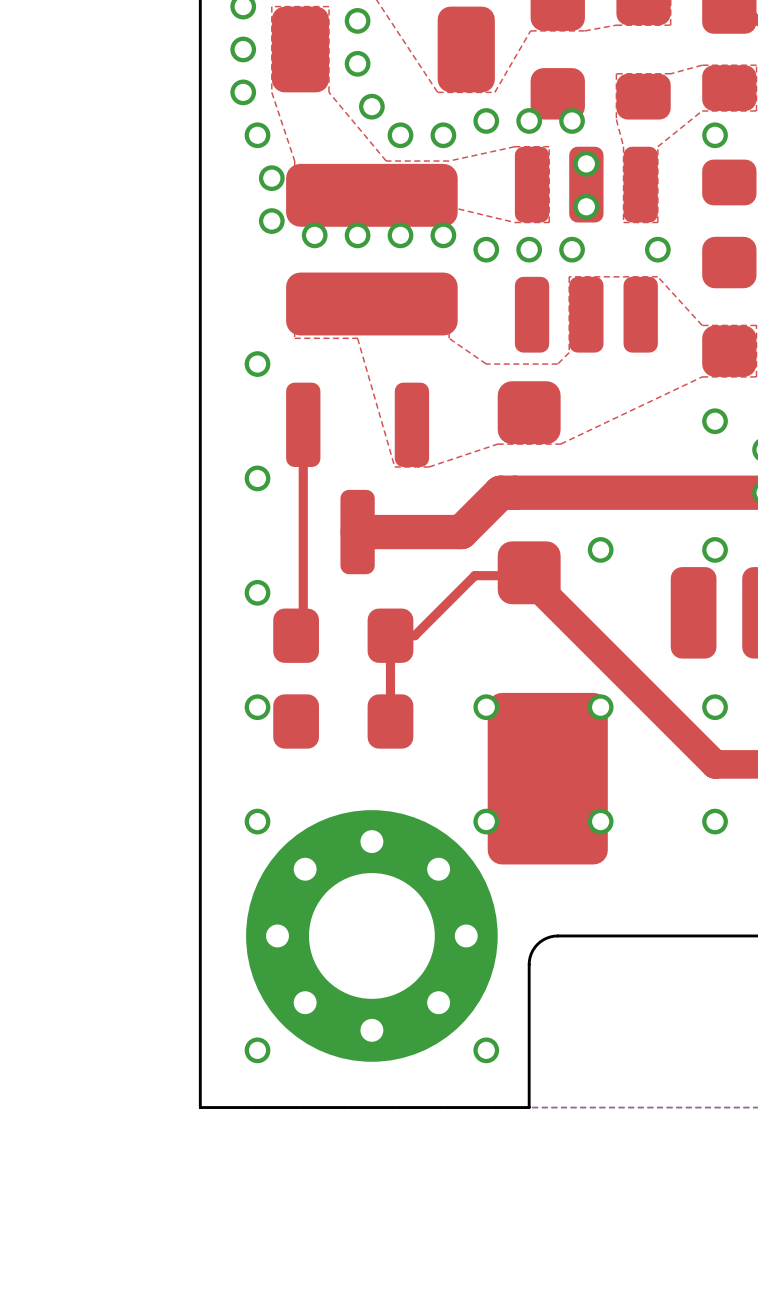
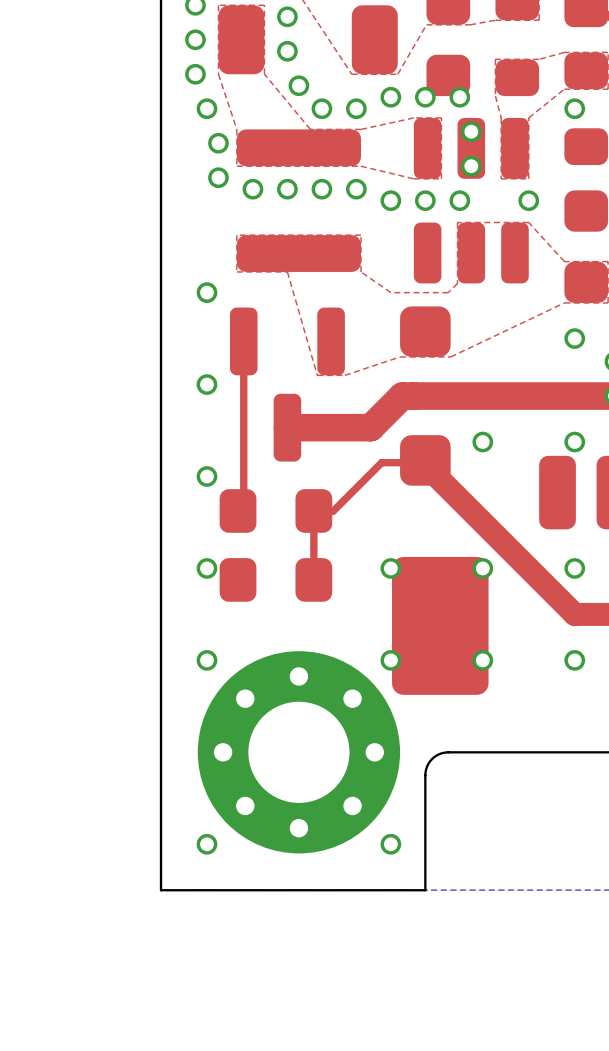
part footprint: [286, 163, 458, 336] -> [236, 129, 361, 272]

